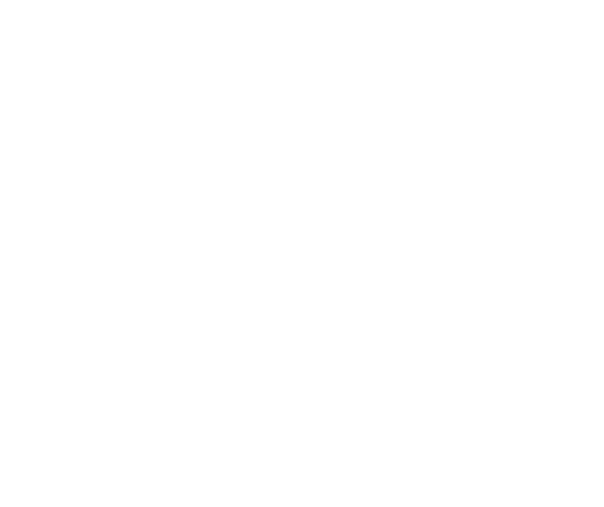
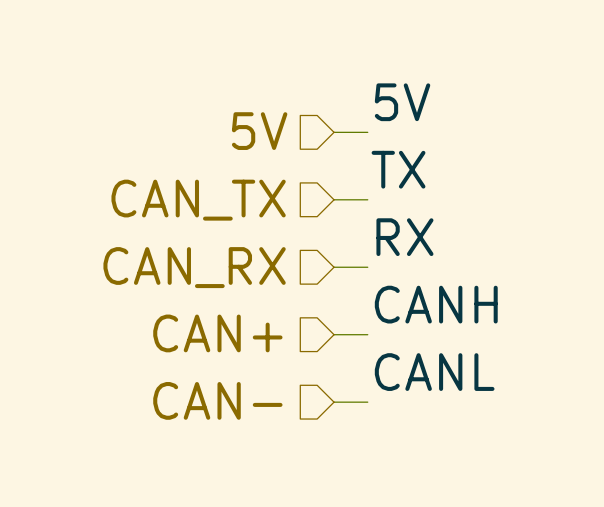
label: none -> 5V (402, 102)
hierarchical label: none -> 5V (259, 131)
wire: none -> (334, 132) (367, 132)
label: none -> TX (398, 169)
wire: none -> (334, 199) (367, 199)
hierarchical label: none -> CAN_TX (198, 200)
label: none -> RX (404, 237)
wire: none -> (334, 267) (367, 267)
hierarchical label: none -> CAN_RX (194, 267)
label: none -> CANH (436, 304)
hierarchical label: none -> CAN+ (217, 333)
wire: none -> (334, 334) (367, 334)
label: none -> CANL (434, 372)
hierarchical label: none -> CAN- (217, 400)
wire: none -> (334, 402) (367, 402)

